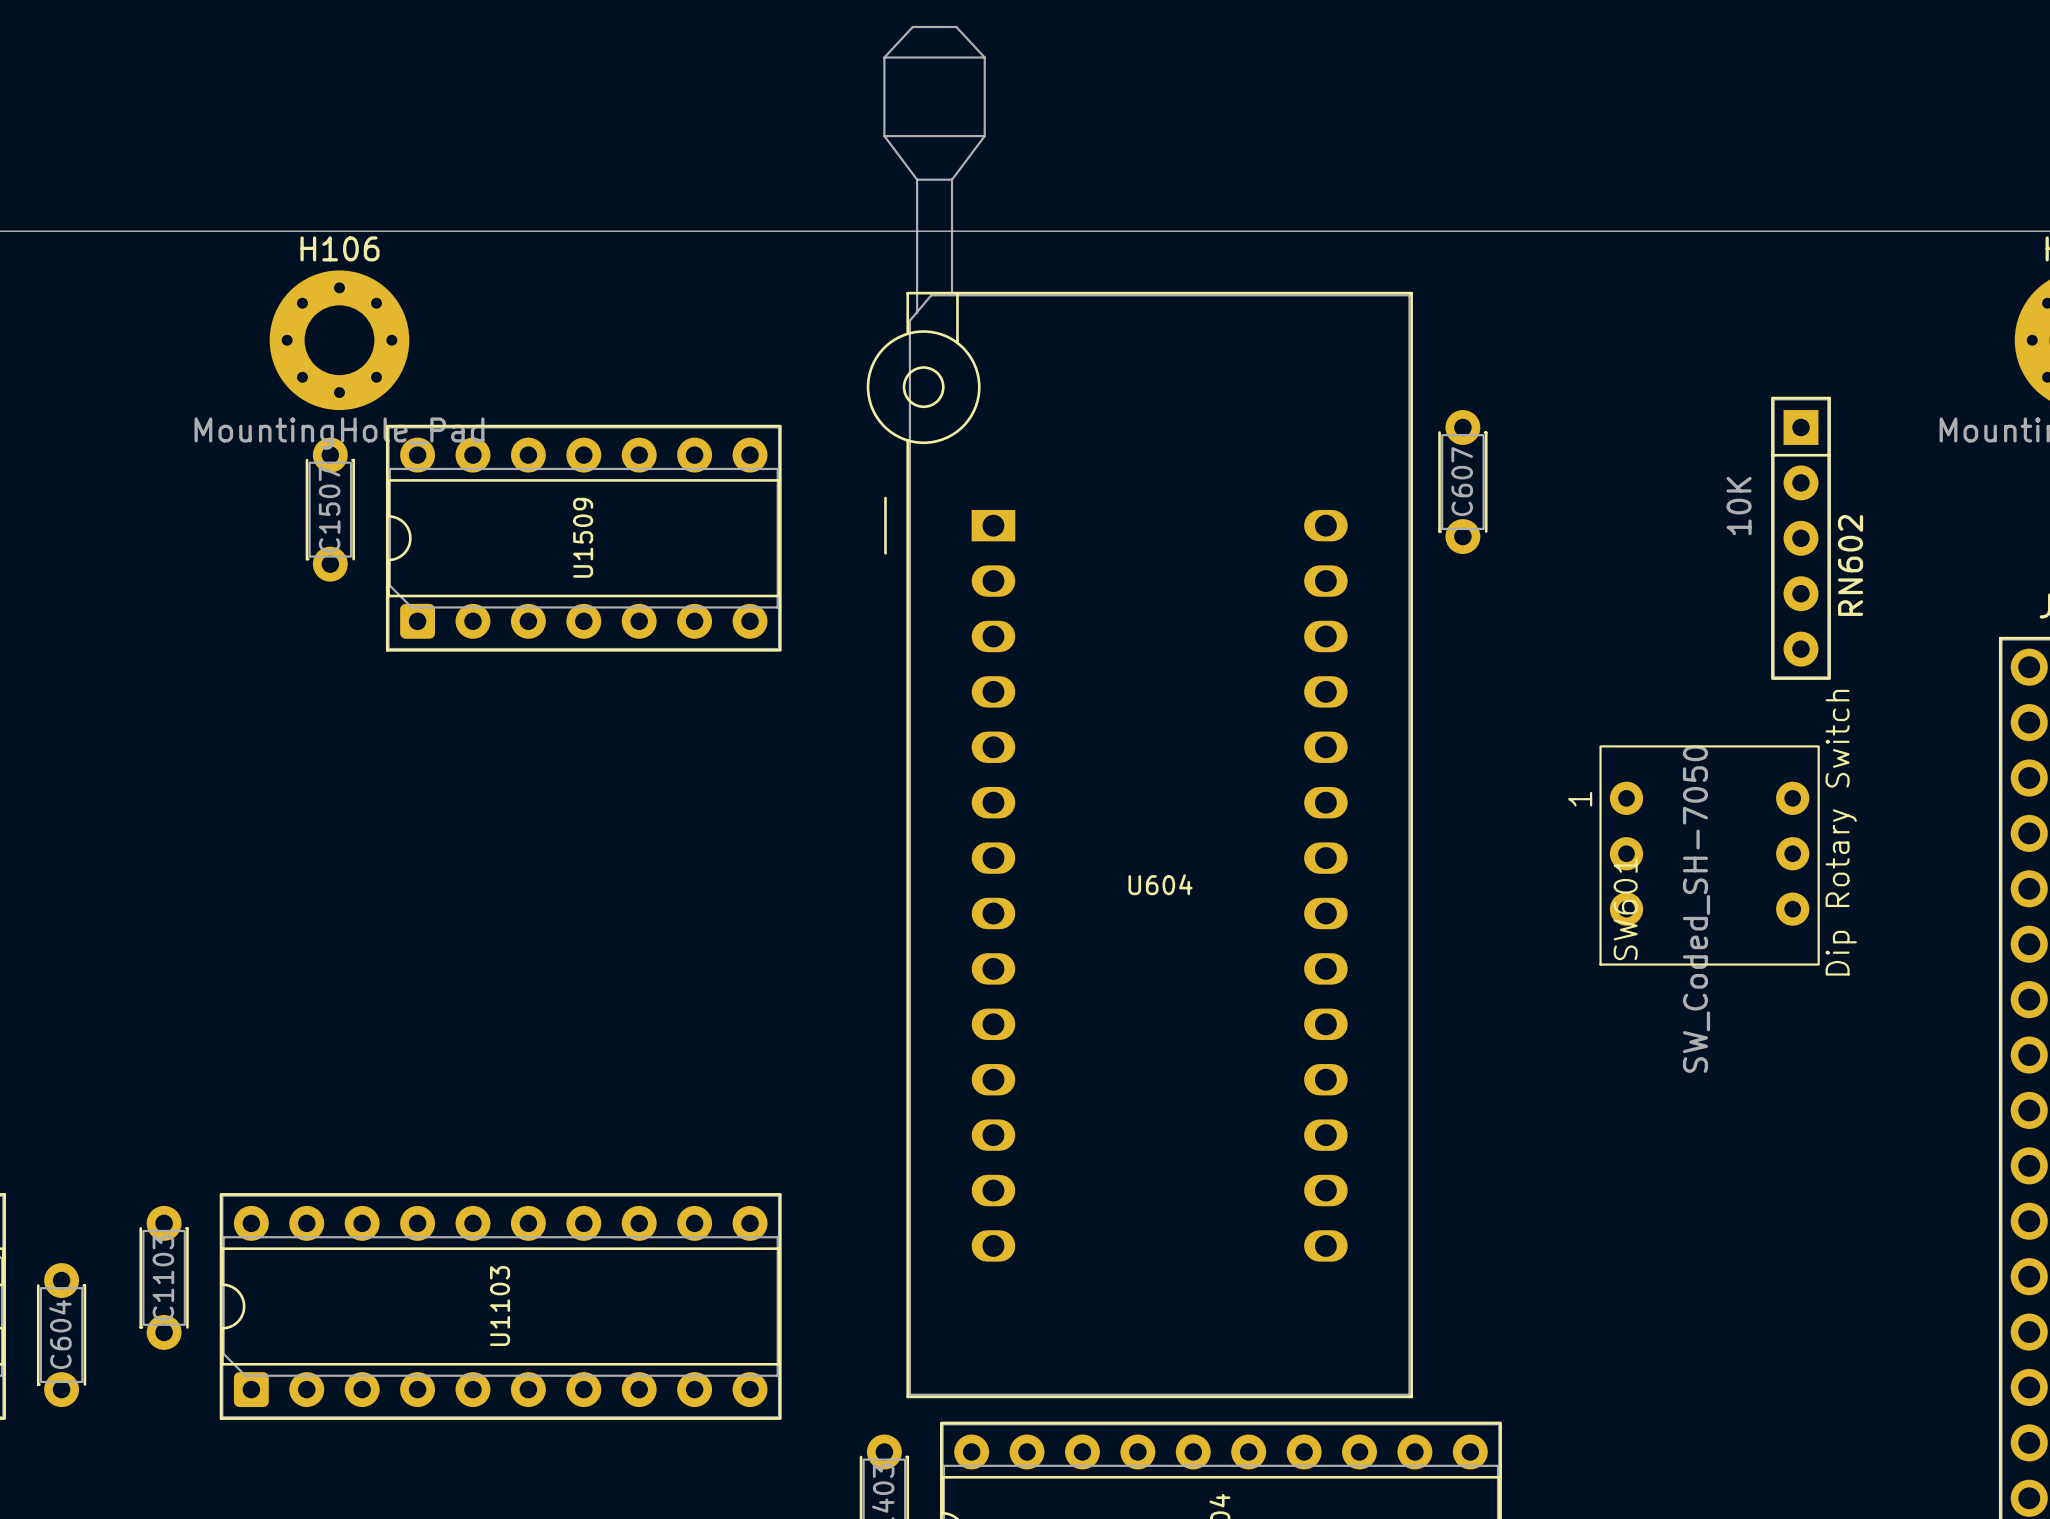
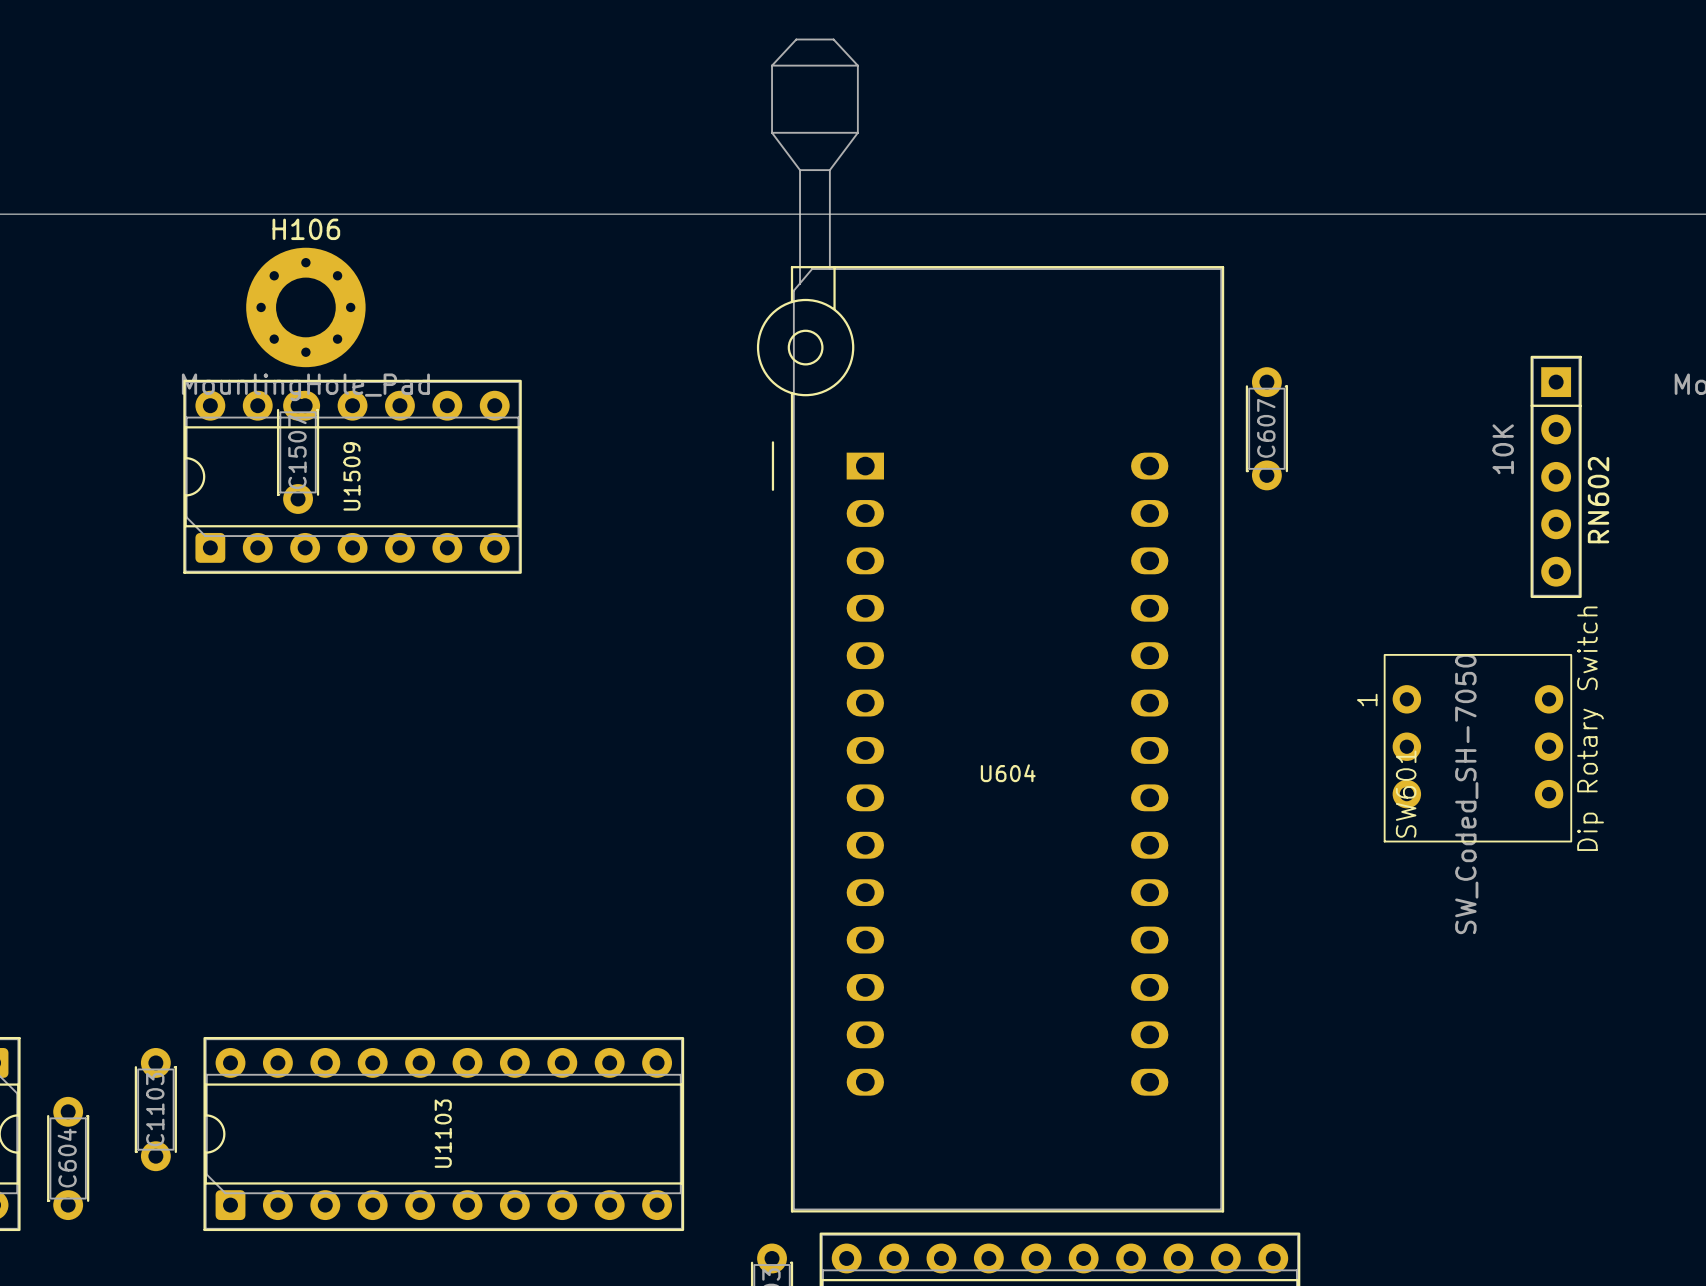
U1509 position: (583, 538) -> (352, 476)

